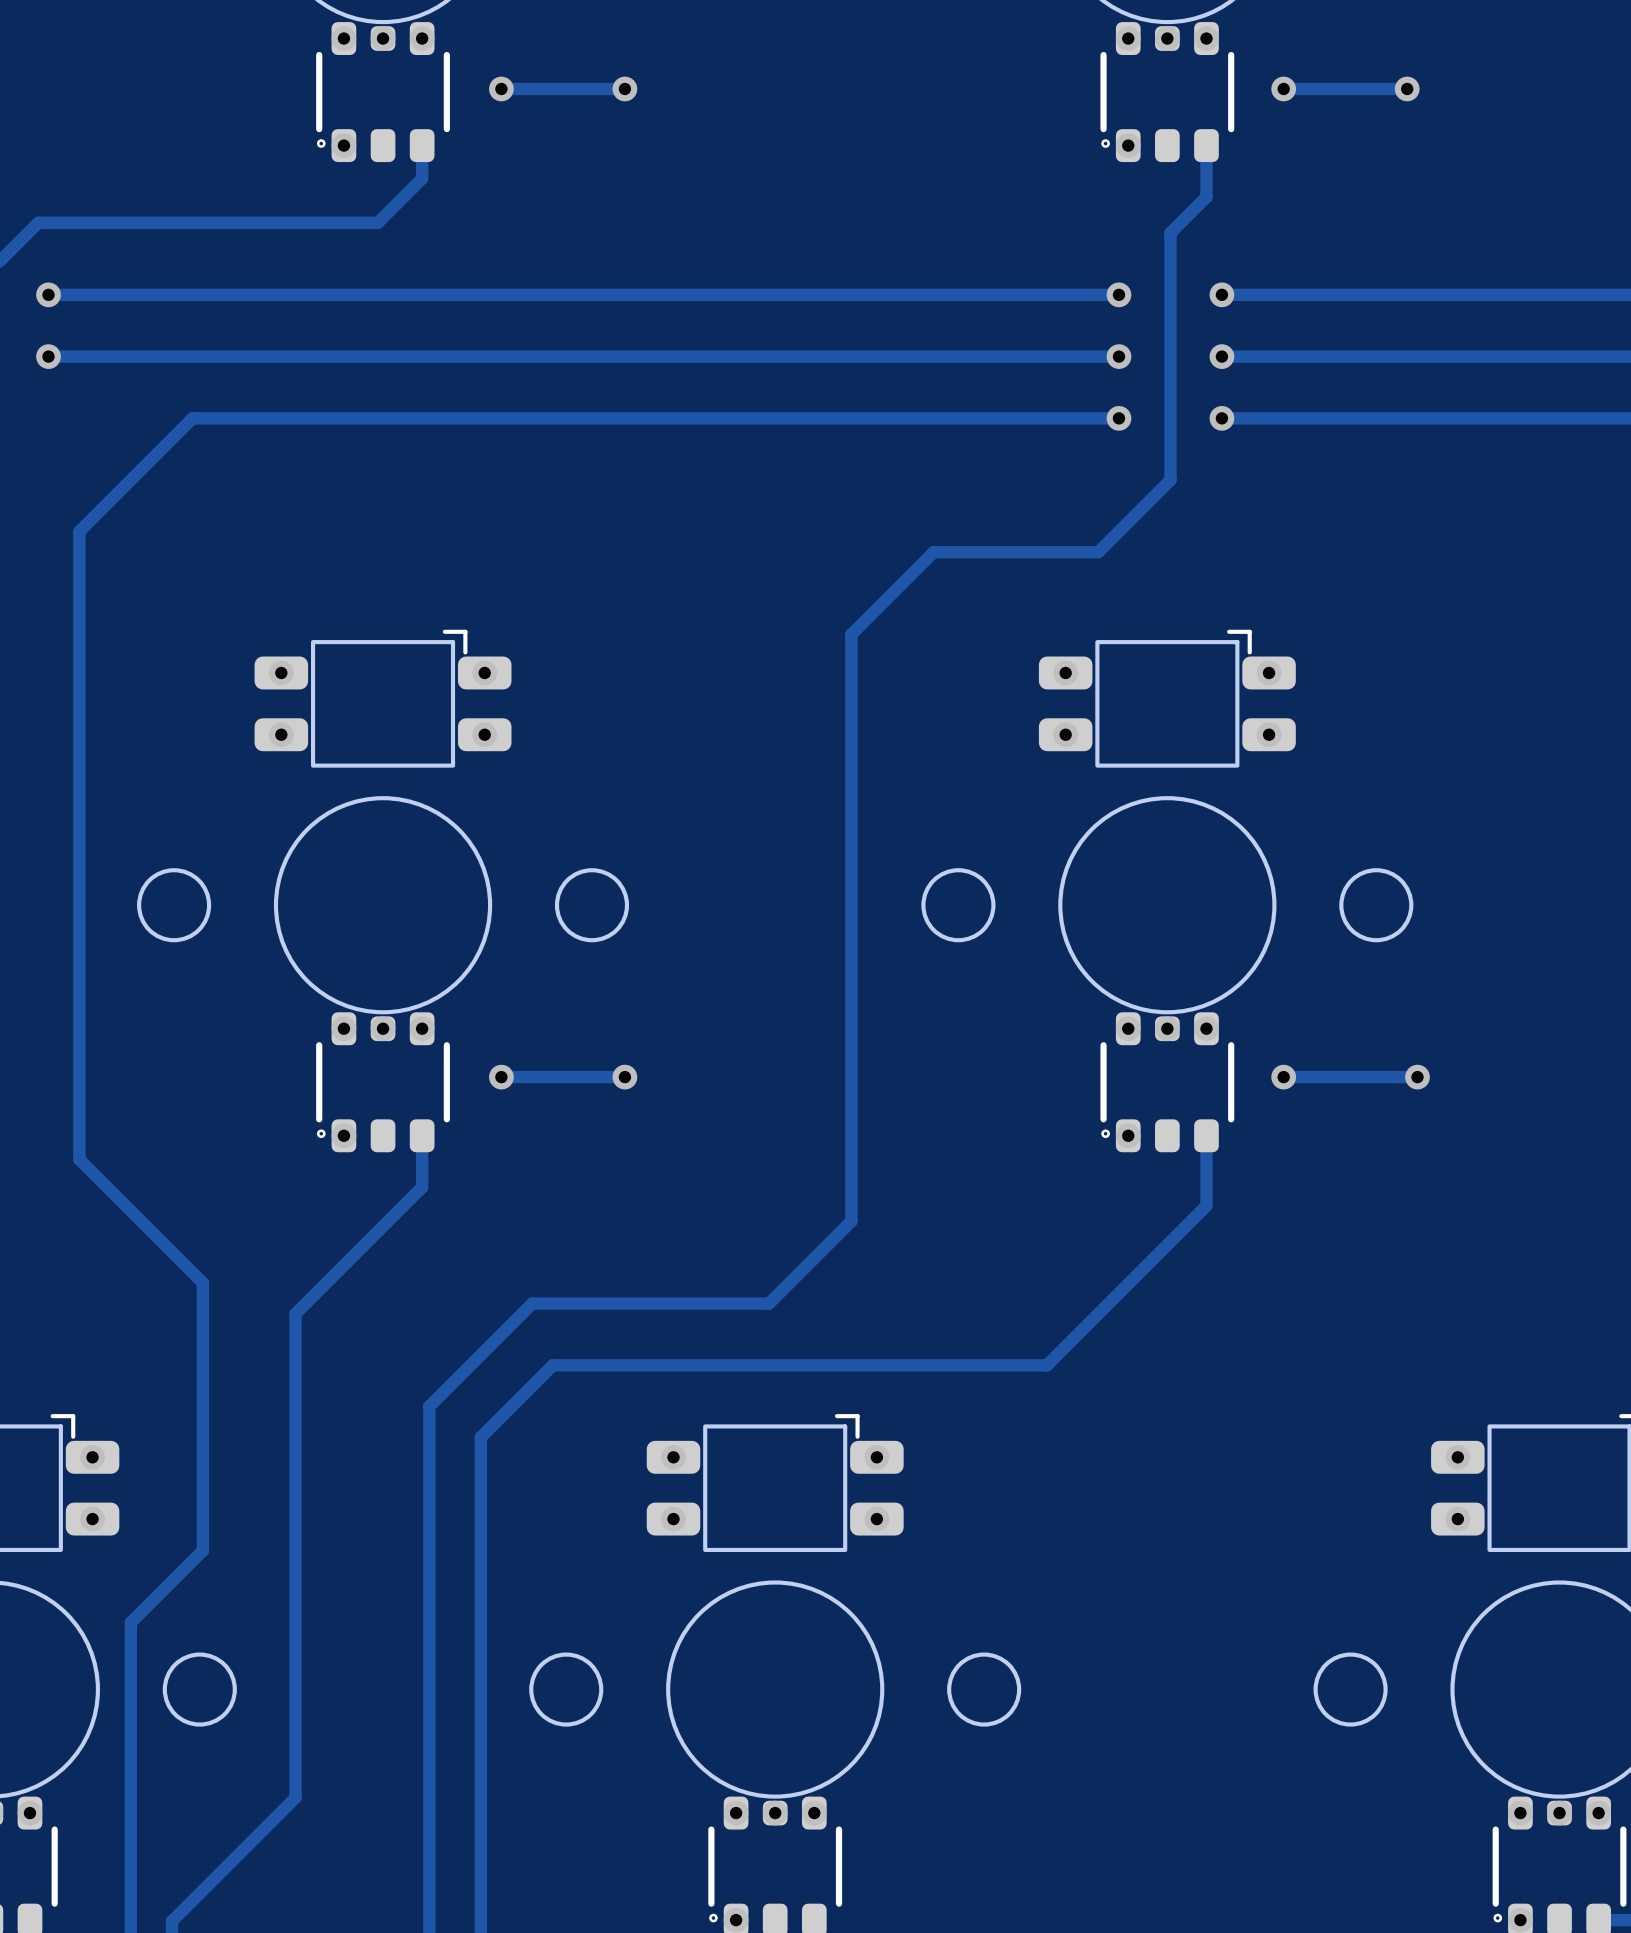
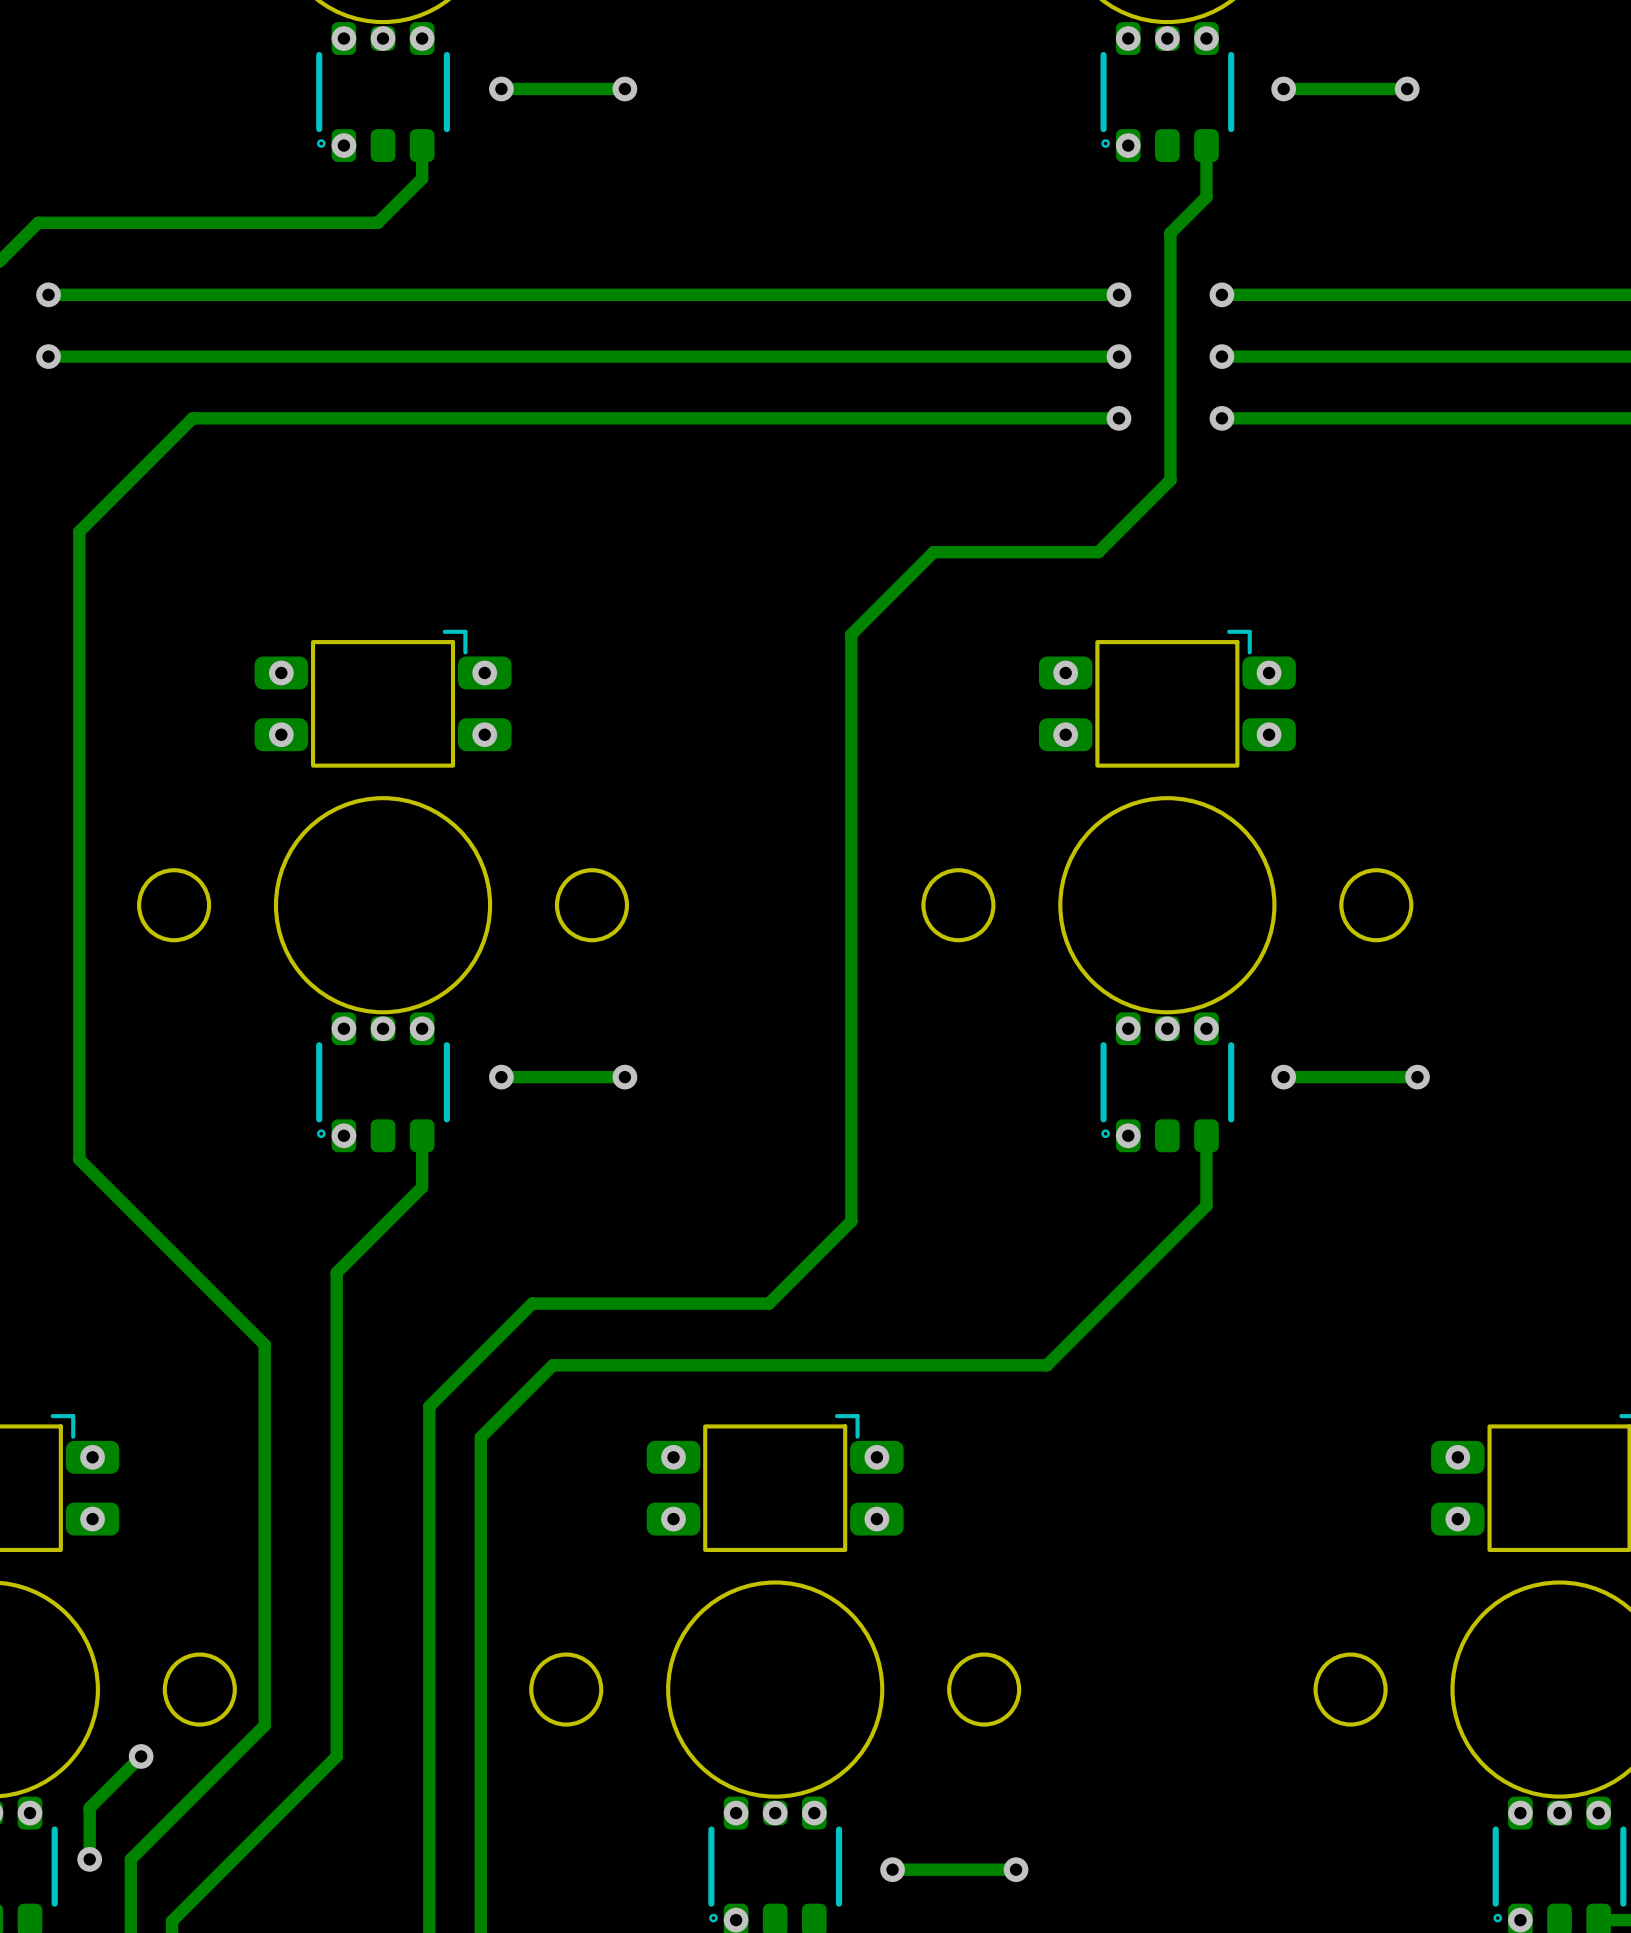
track: (336, 1272) (295, 1313) (295, 1797) -> (336, 1272) (336, 1756) (295, 1797)
track: (202, 1282) (202, 1550) (130, 1622) (130, 1859) -> (202, 1282) (264, 1344) (264, 1725) (130, 1859)
track: none -> (141, 1756) (89, 1807) (89, 1859)
via: none -> (141, 1756)
via: none -> (89, 1859)
via: none -> (892, 1869)
track: none -> (1016, 1869) (892, 1869)
via: none -> (1016, 1869)

